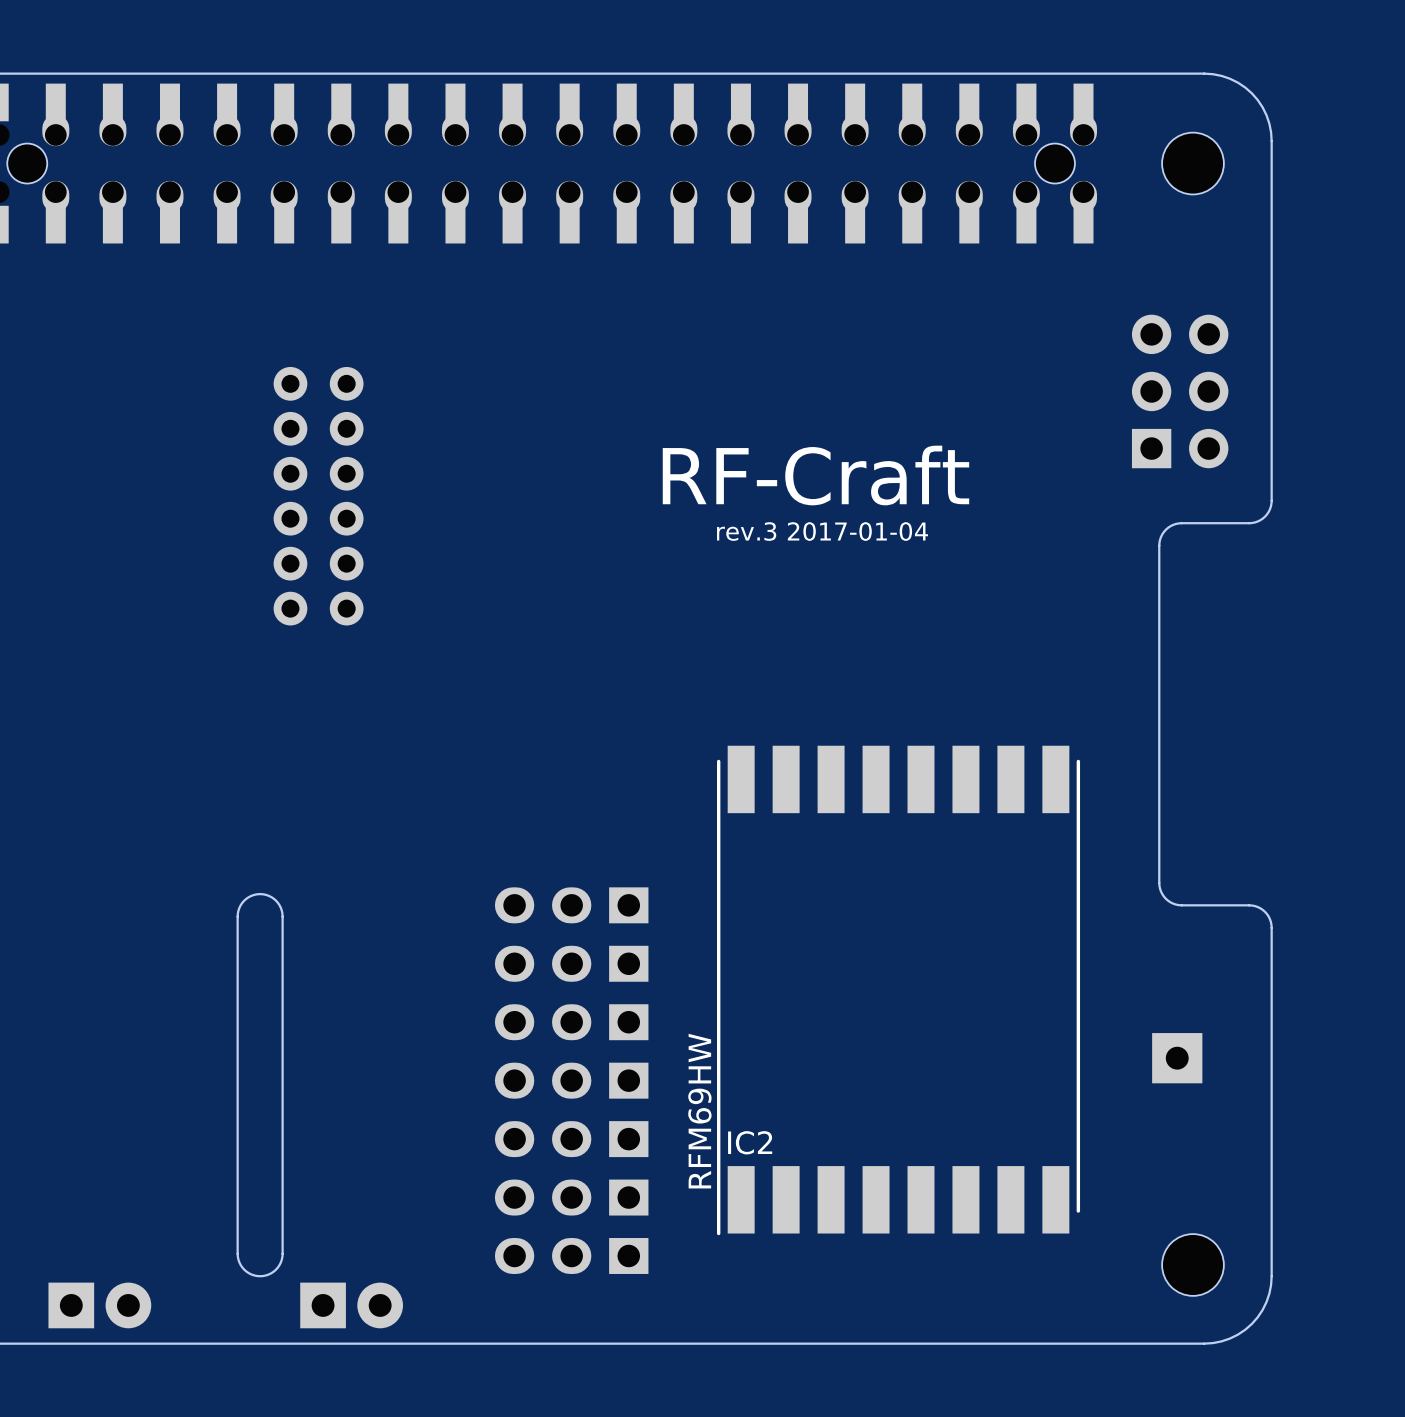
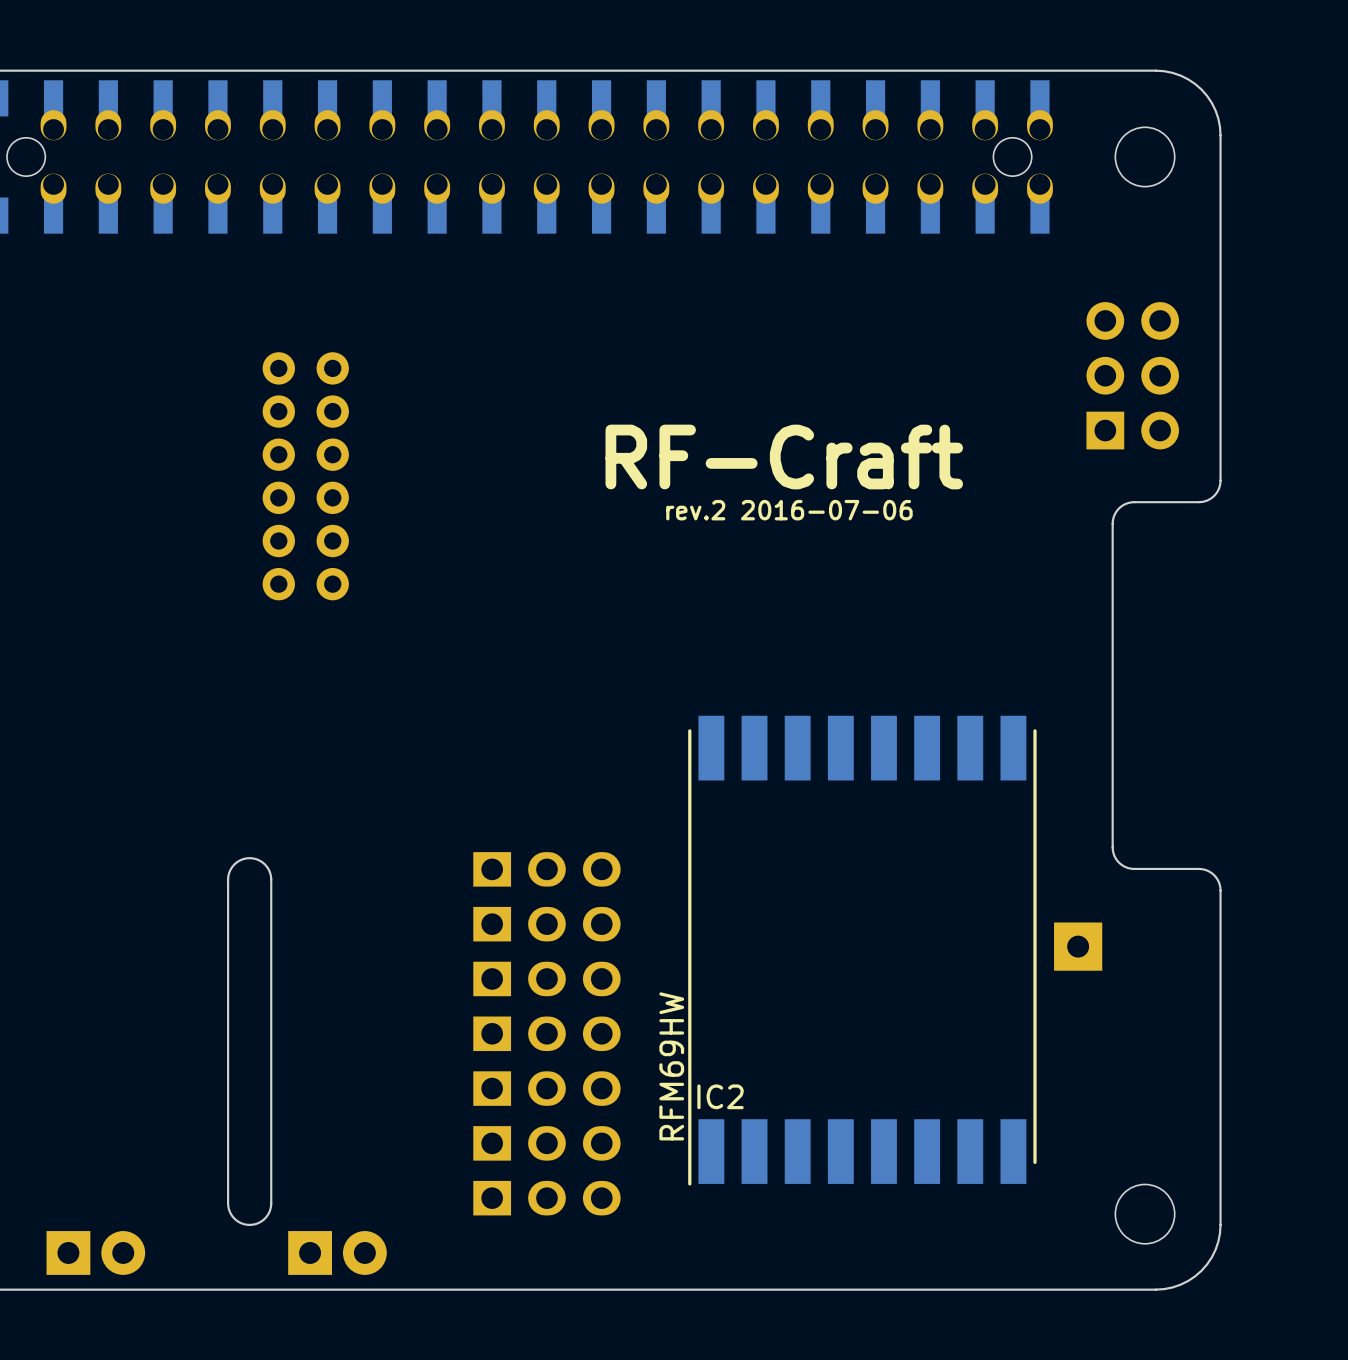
text: rev.3 2017-01-04 (822, 531) -> rev.2 2016-07-06 (789, 510)
part rotation: 0° (571, 905) -> 180° (546, 869)
part rotation: 0° (571, 963) -> 180° (546, 924)
part rotation: 0° (571, 1022) -> 180° (546, 978)
part position: (1177, 1058) -> (1078, 946)
part rotation: 0° (571, 1080) -> 180° (546, 1033)
part rotation: 0° (571, 1139) -> 180° (546, 1088)
part rotation: 0° (571, 1197) -> 180° (546, 1143)
part rotation: 0° (571, 1255) -> 180° (546, 1198)

